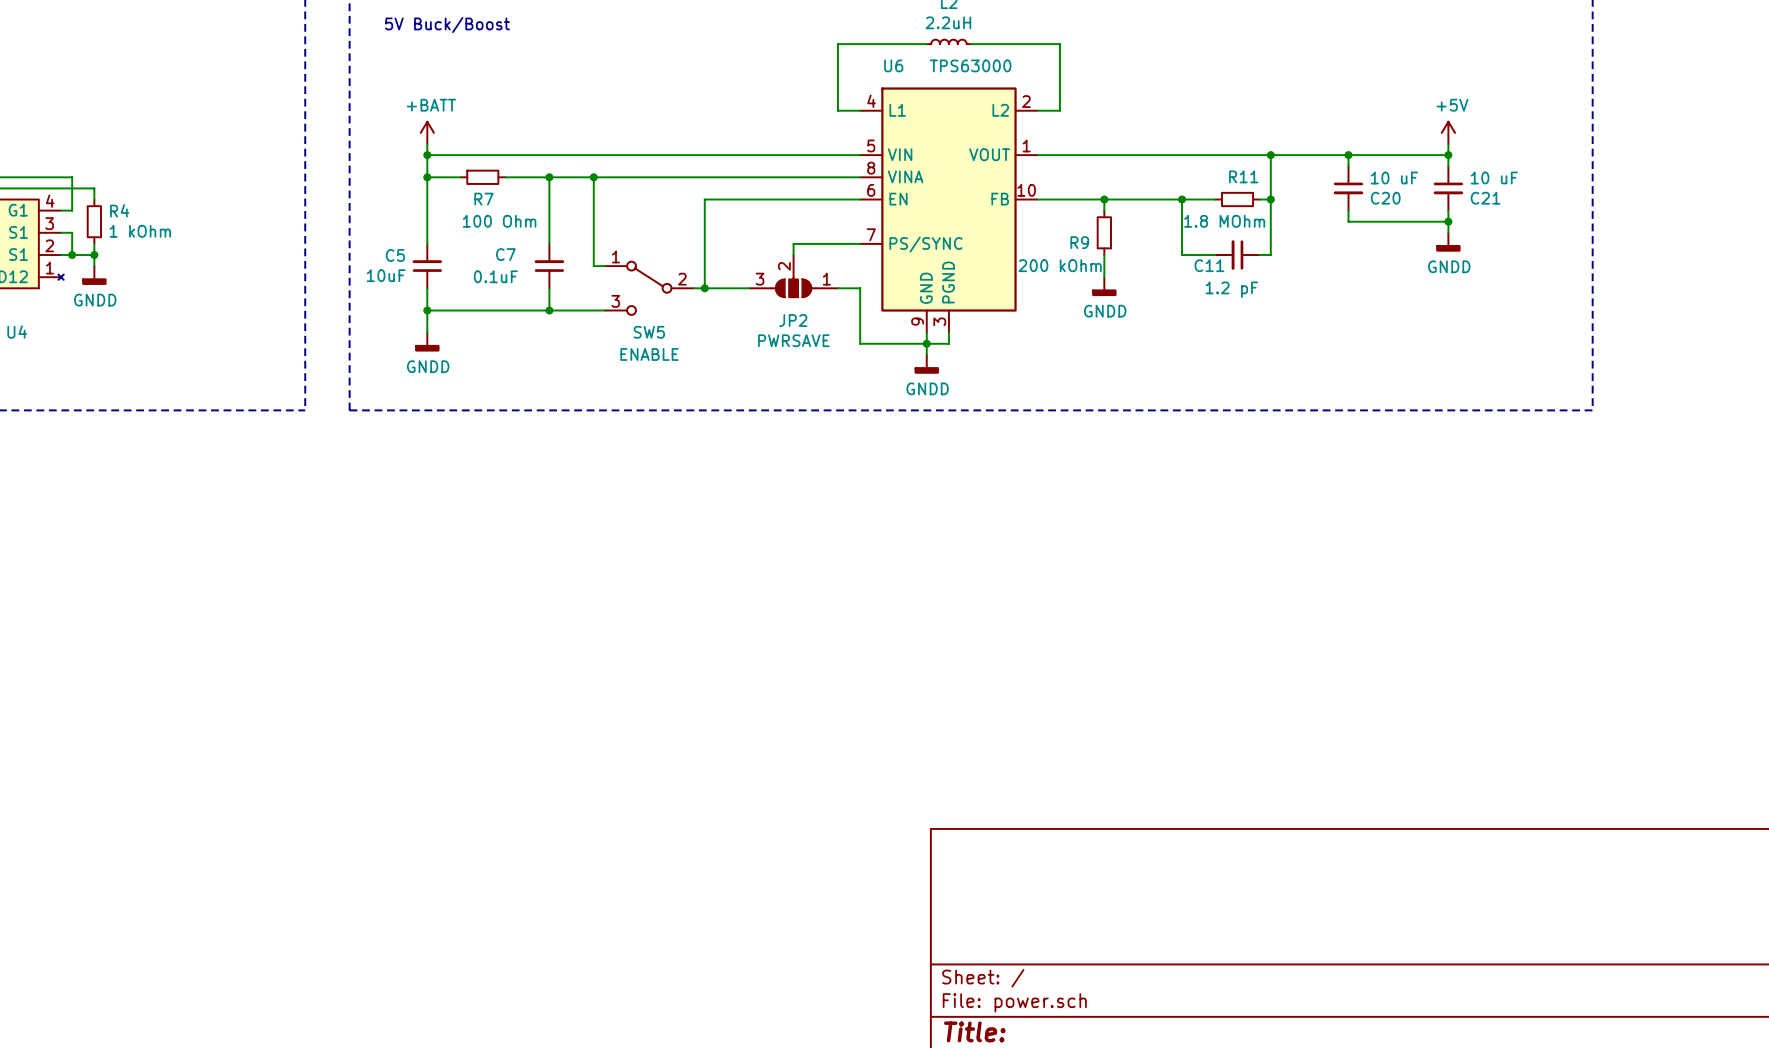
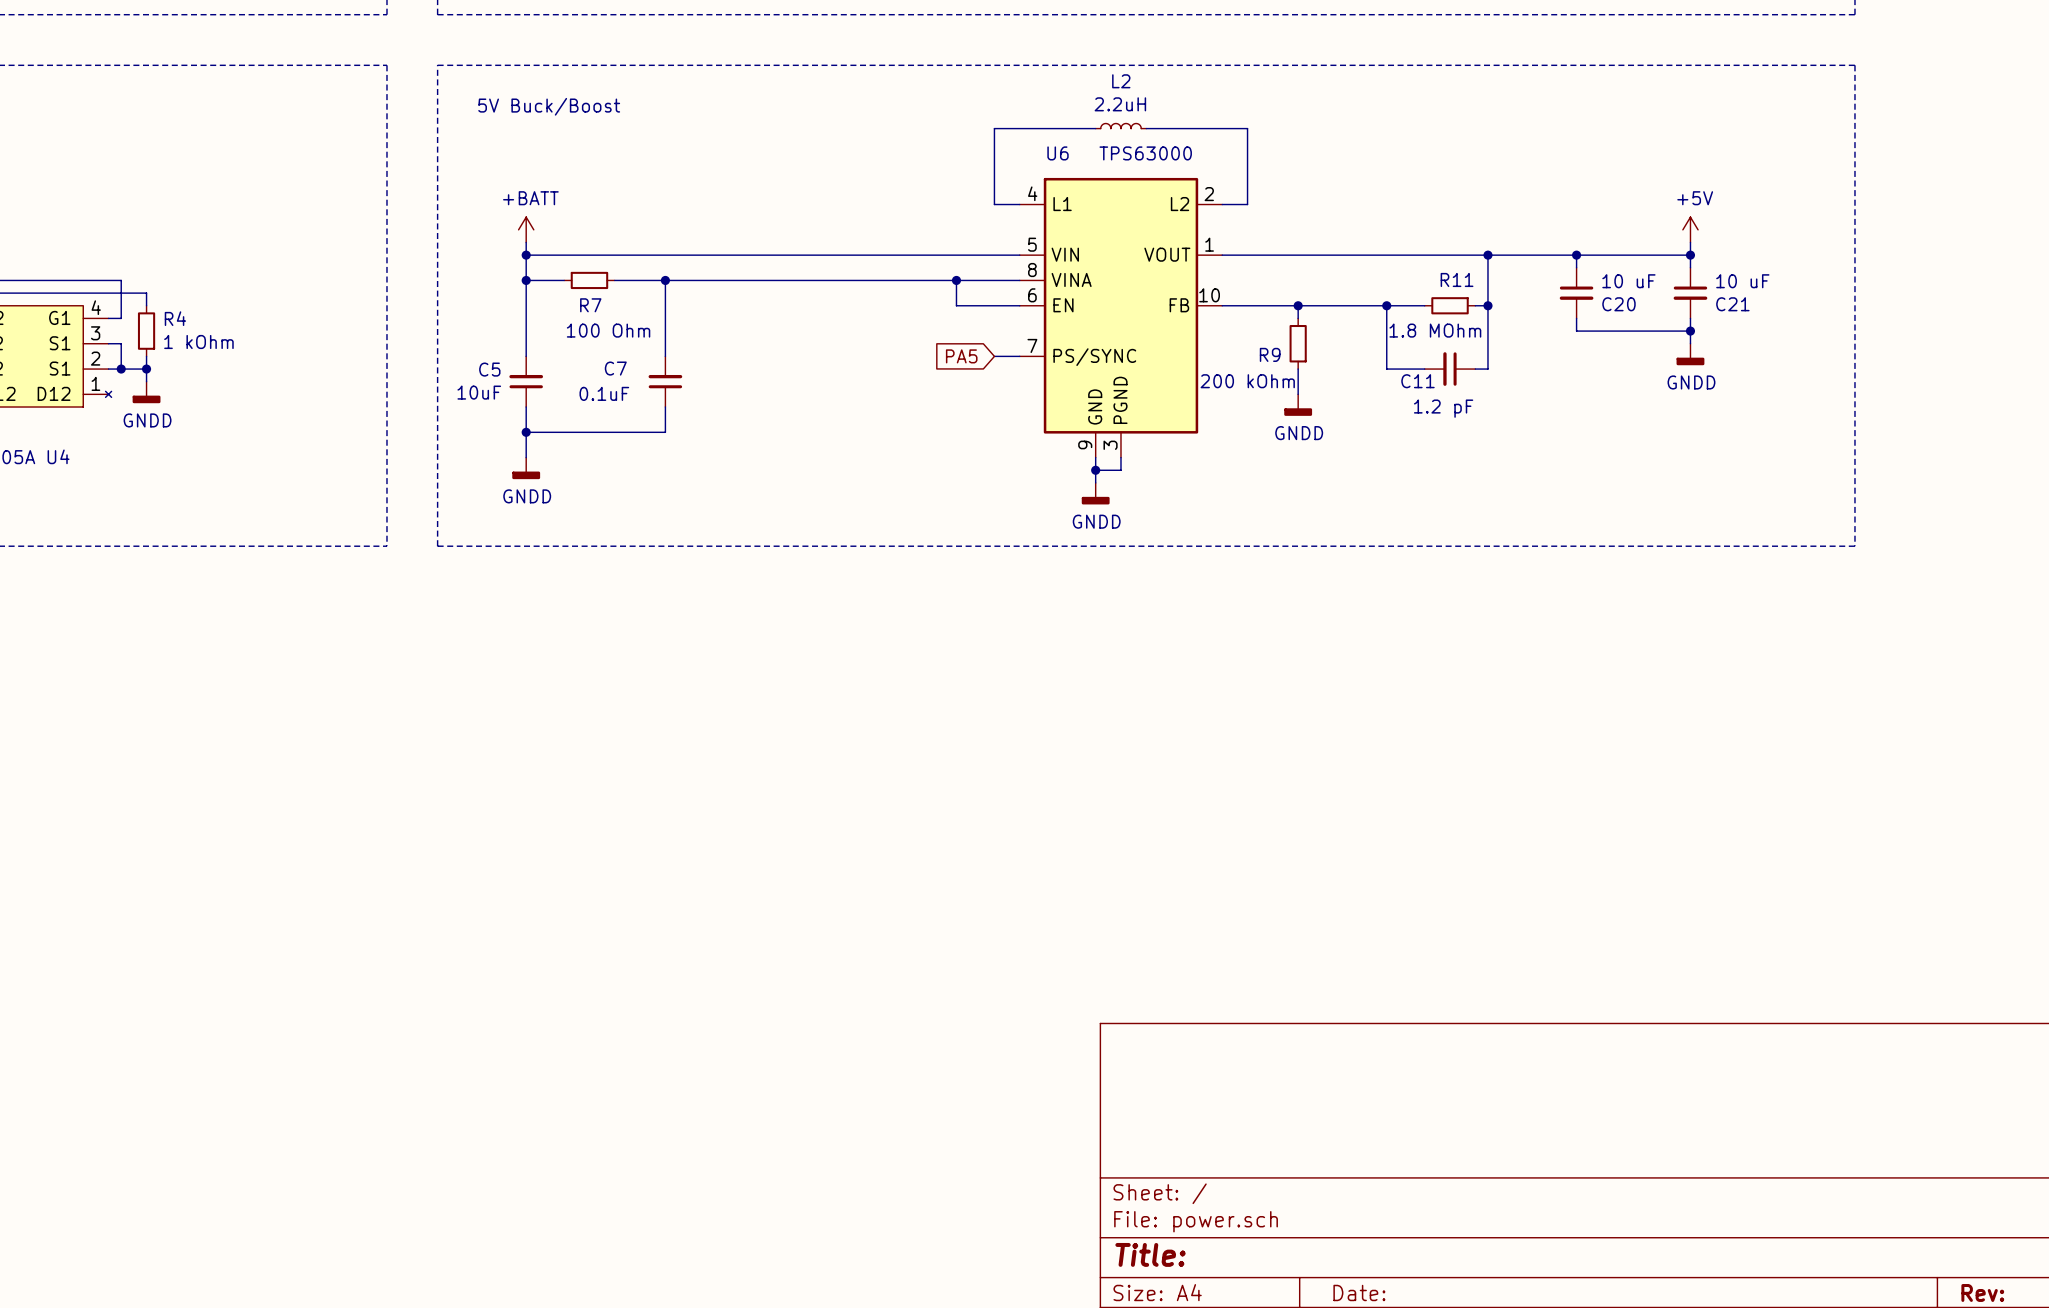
wire: (593, 177) (593, 266) (604, 266) -> none
junction: (593, 177) -> none
junction: none -> (956, 280)
wire: (804, 199) (704, 199) (704, 288) -> (956, 305) (956, 280)
global label: none -> PA5 (961, 356)
wire: (837, 243) (793, 243) (793, 255) -> none
JP2: PWRSAVE (793, 276) -> none
SW5: ENABLE (649, 288) -> none
wire: (693, 288) (749, 288) -> none
junction: (704, 288) -> none
wire: (837, 288) (860, 288) (860, 343) (926, 343) -> none
wire: (549, 310) (604, 310) -> none
junction: (549, 310) -> none

